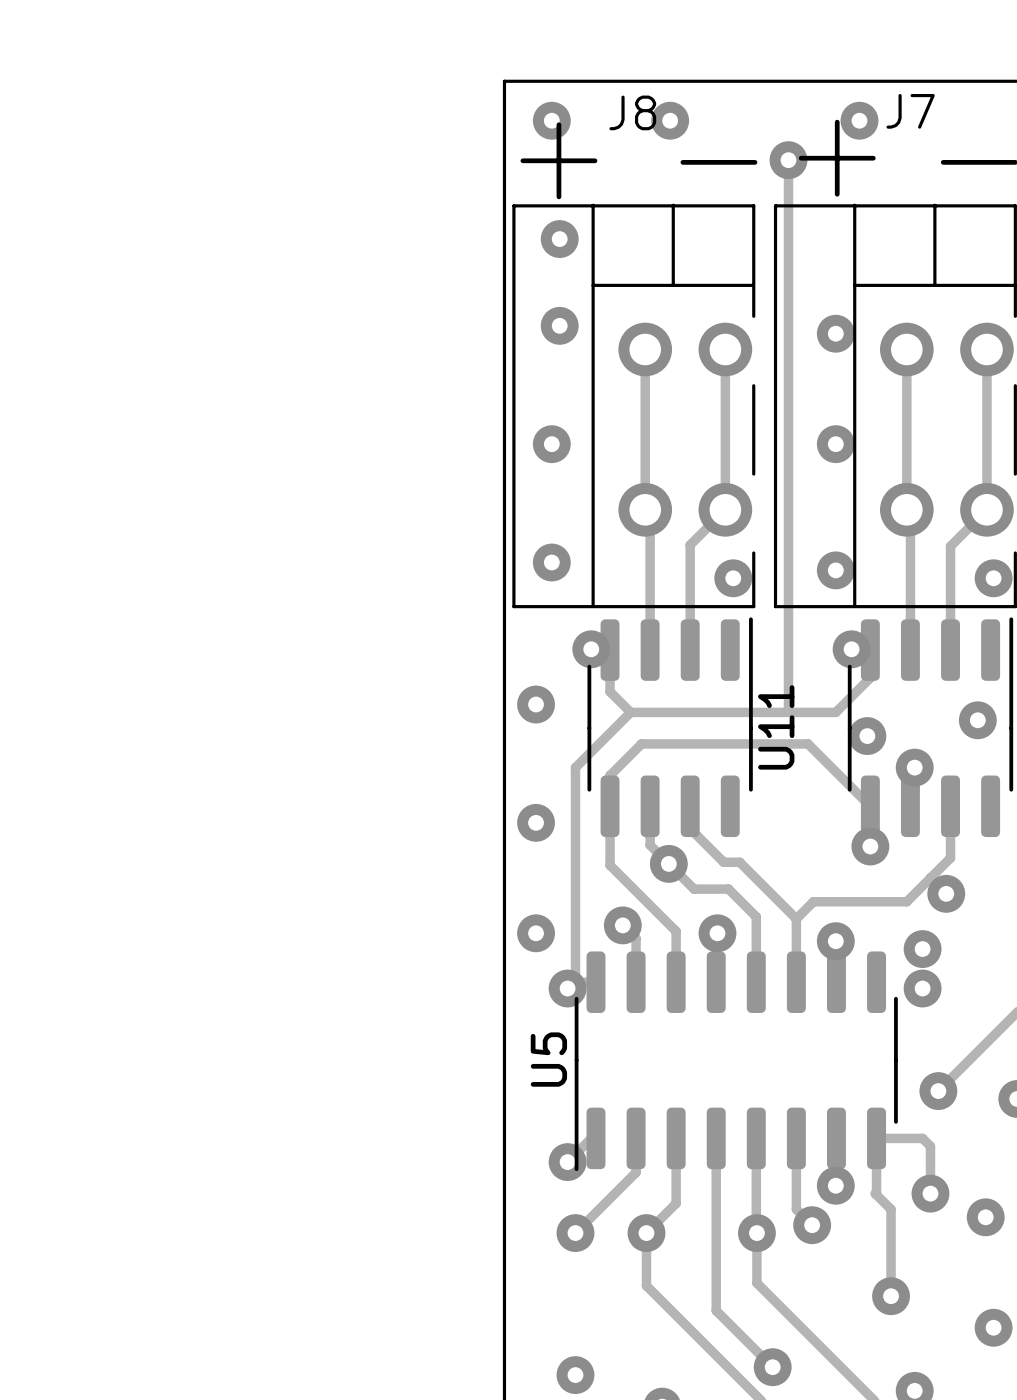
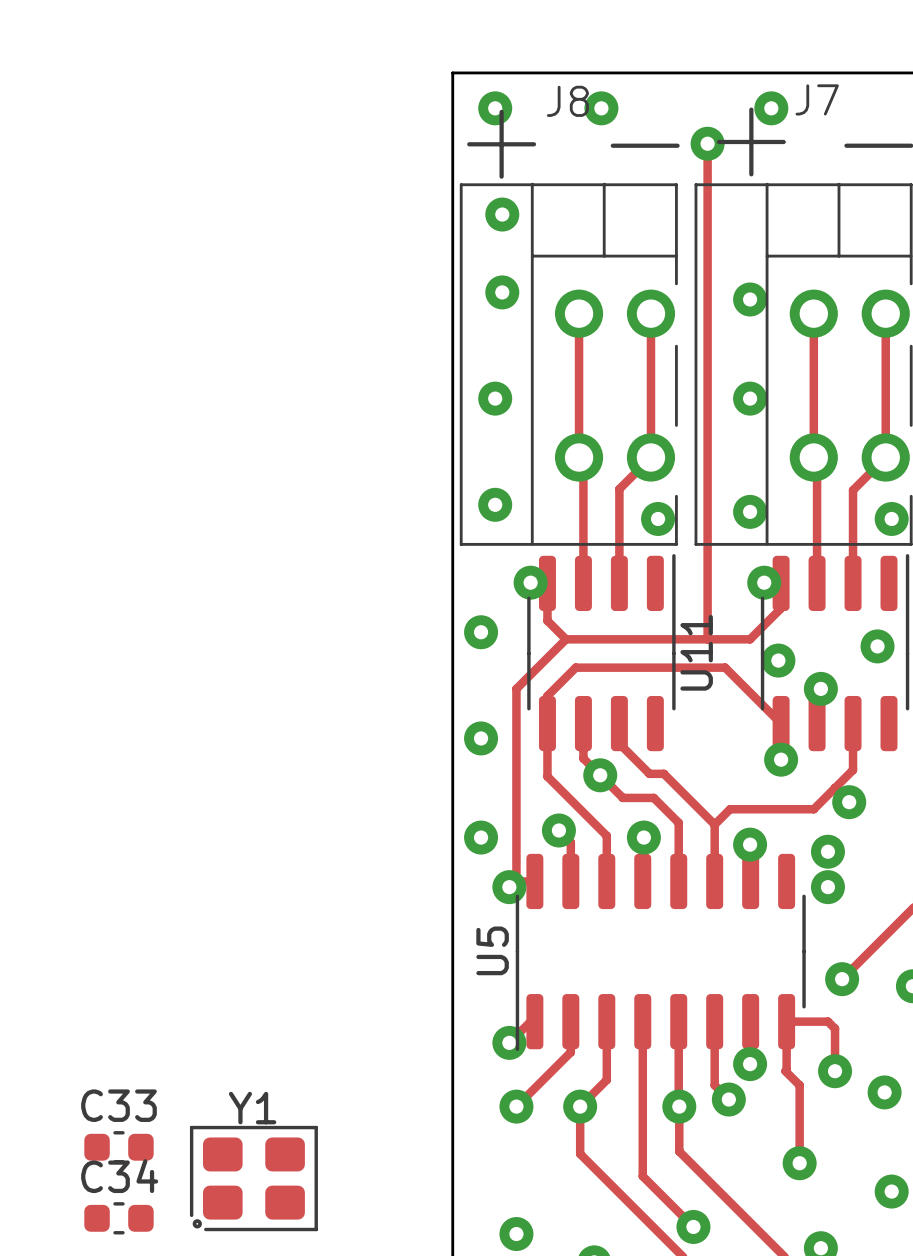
C33: none -> (118, 1147)
Y1: none -> (253, 1178)
C34: none -> (118, 1218)

